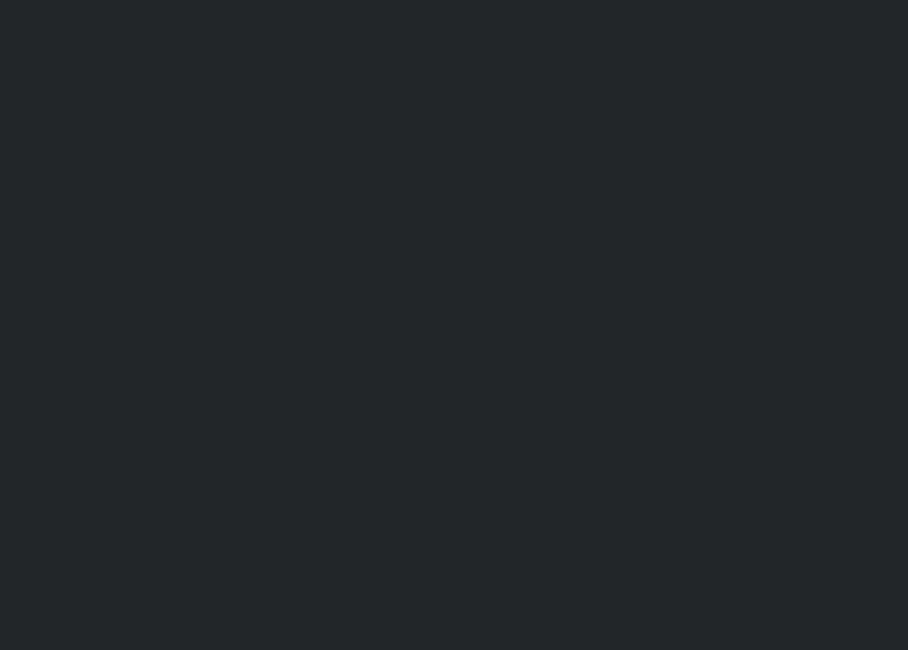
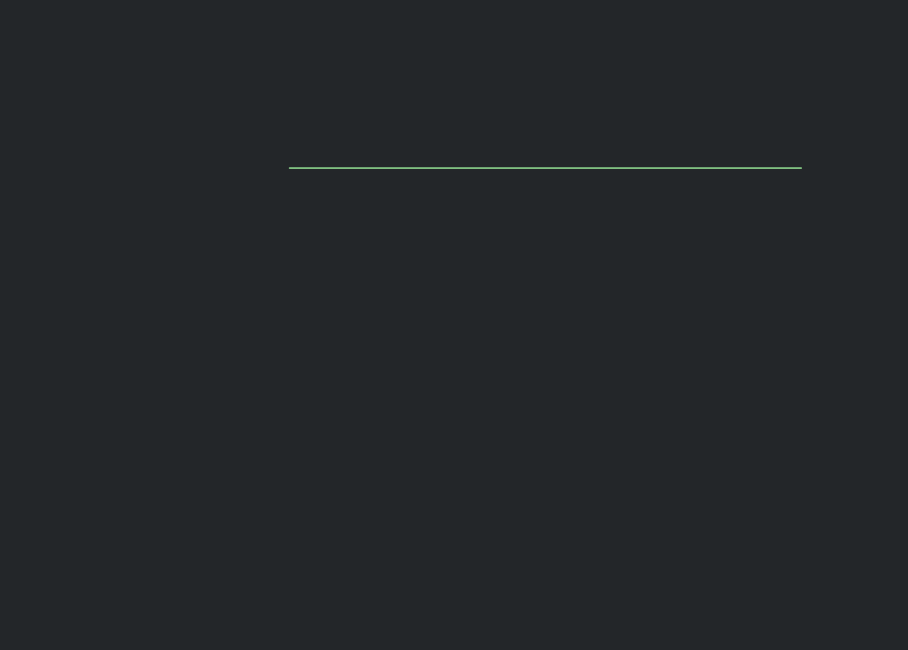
wire: none -> (289, 168) (801, 168)

